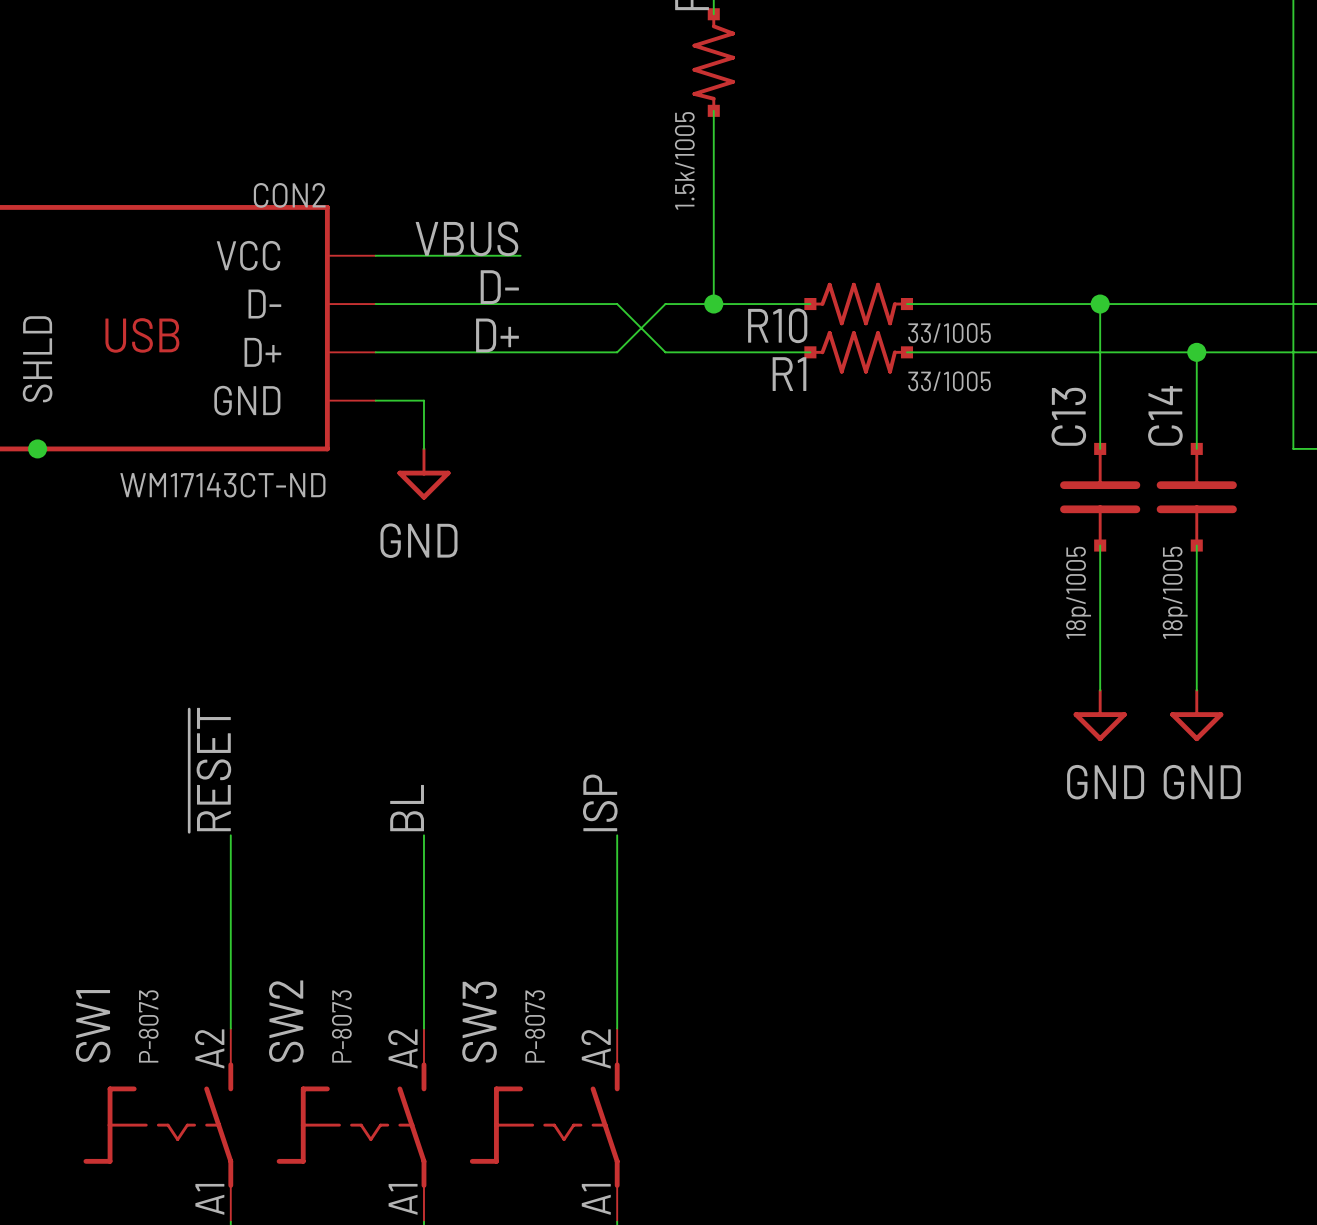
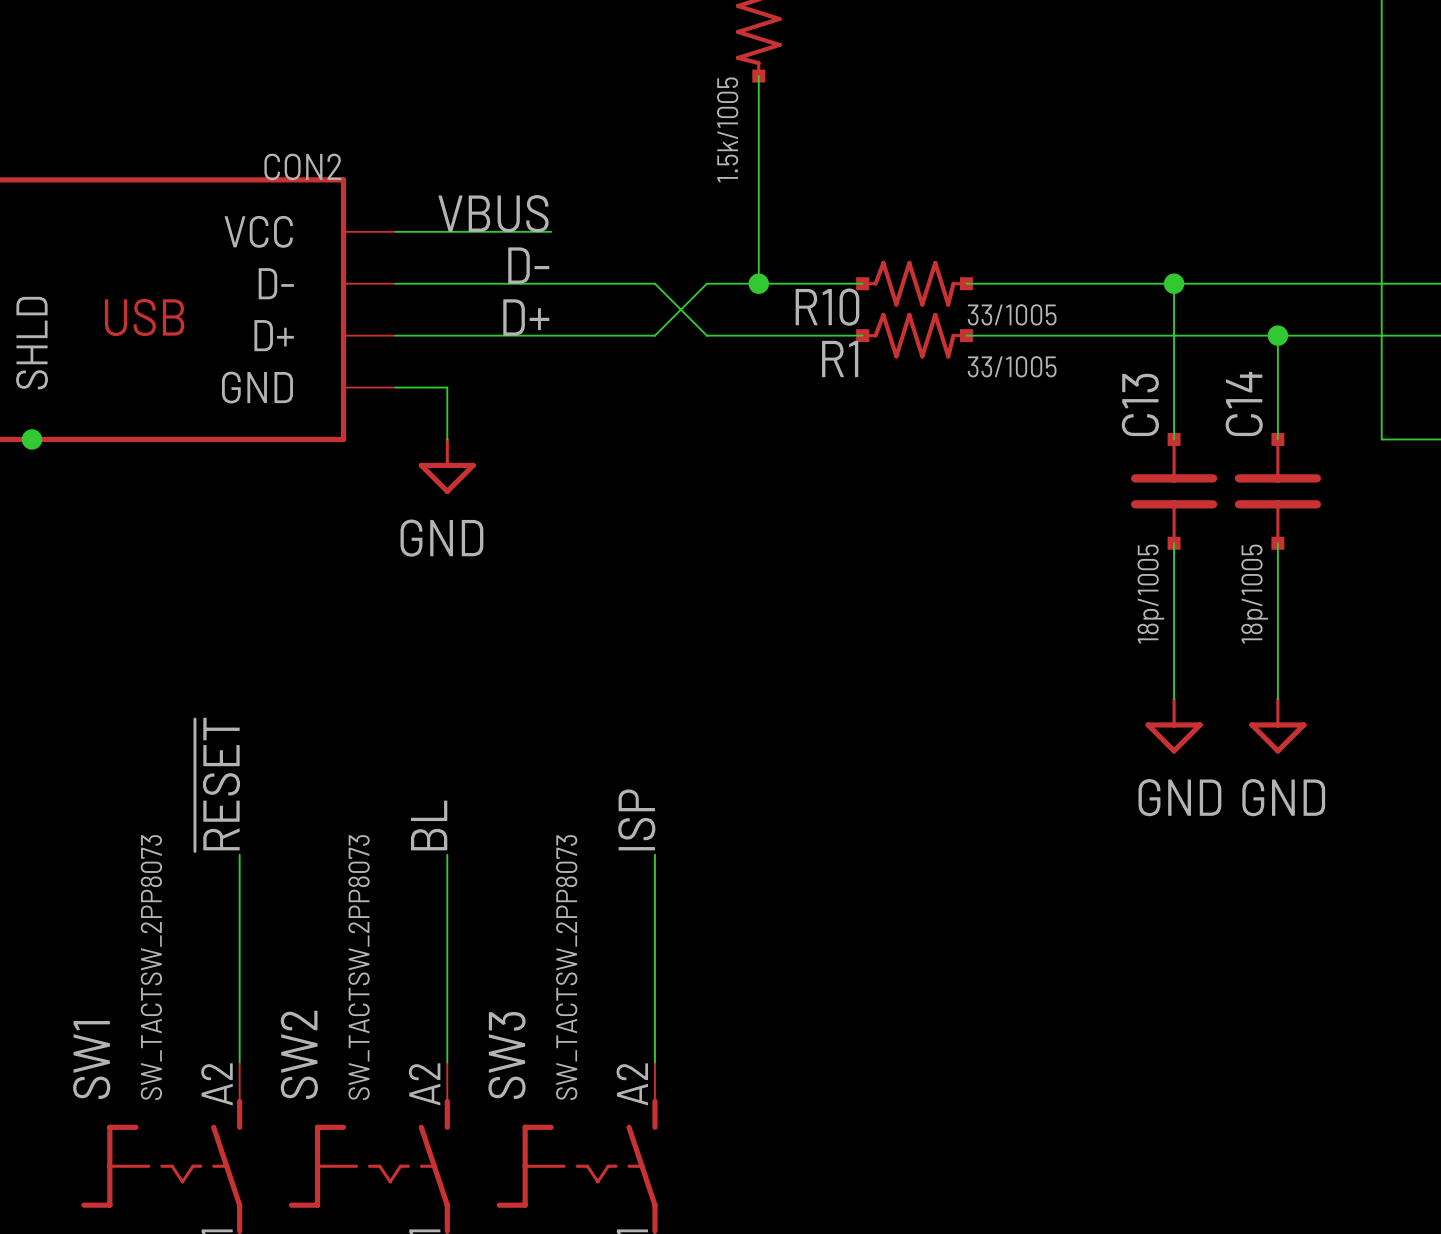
CON2 value: WM17143CT-ND (222, 485) -> none
SW1 value: P-8073 (148, 1026) -> SW_TACTSW_2PP8073 (151, 967)
SW2 value: P-8073 (341, 1026) -> SW_TACTSW_2PP8073 (359, 967)
SW3 value: P-8073 (535, 1026) -> SW_TACTSW_2PP8073 (566, 967)

